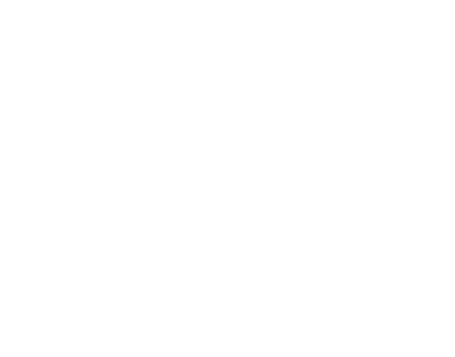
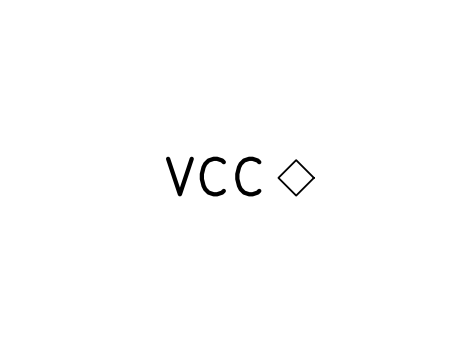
hierarchical label: none -> VCC (213, 176)

